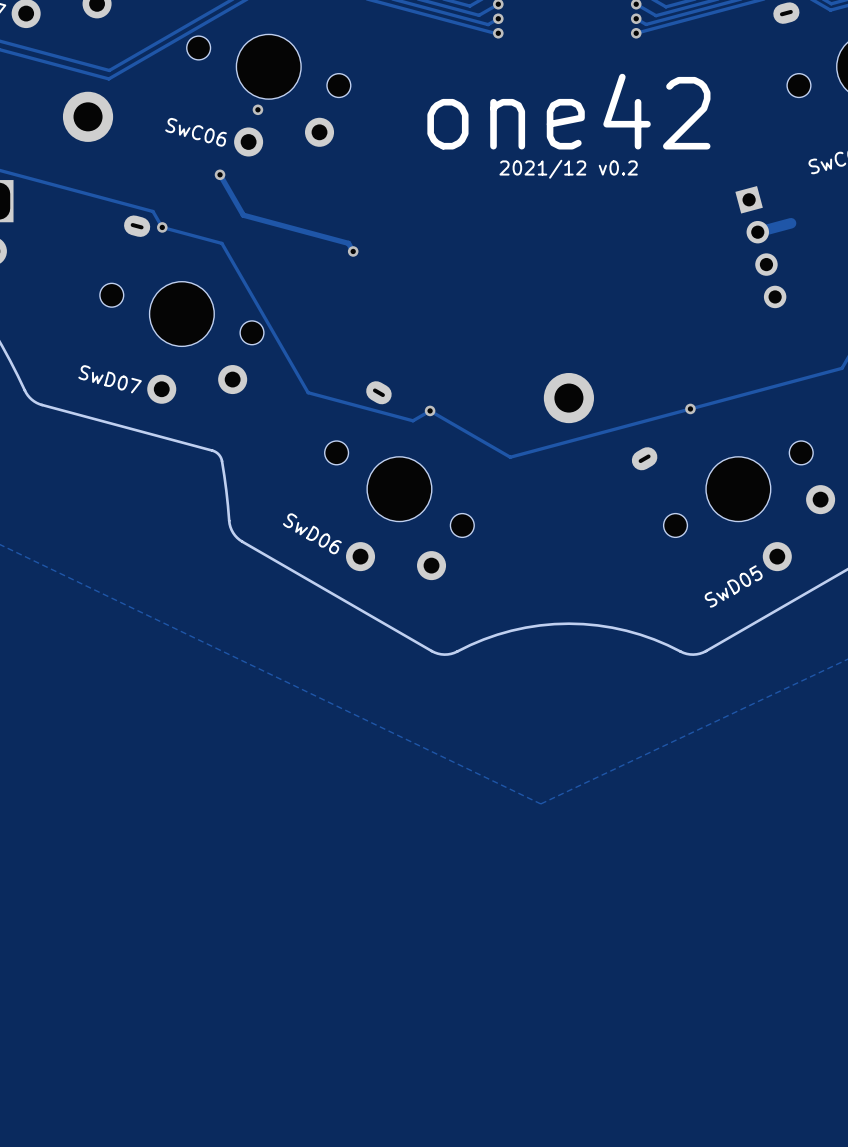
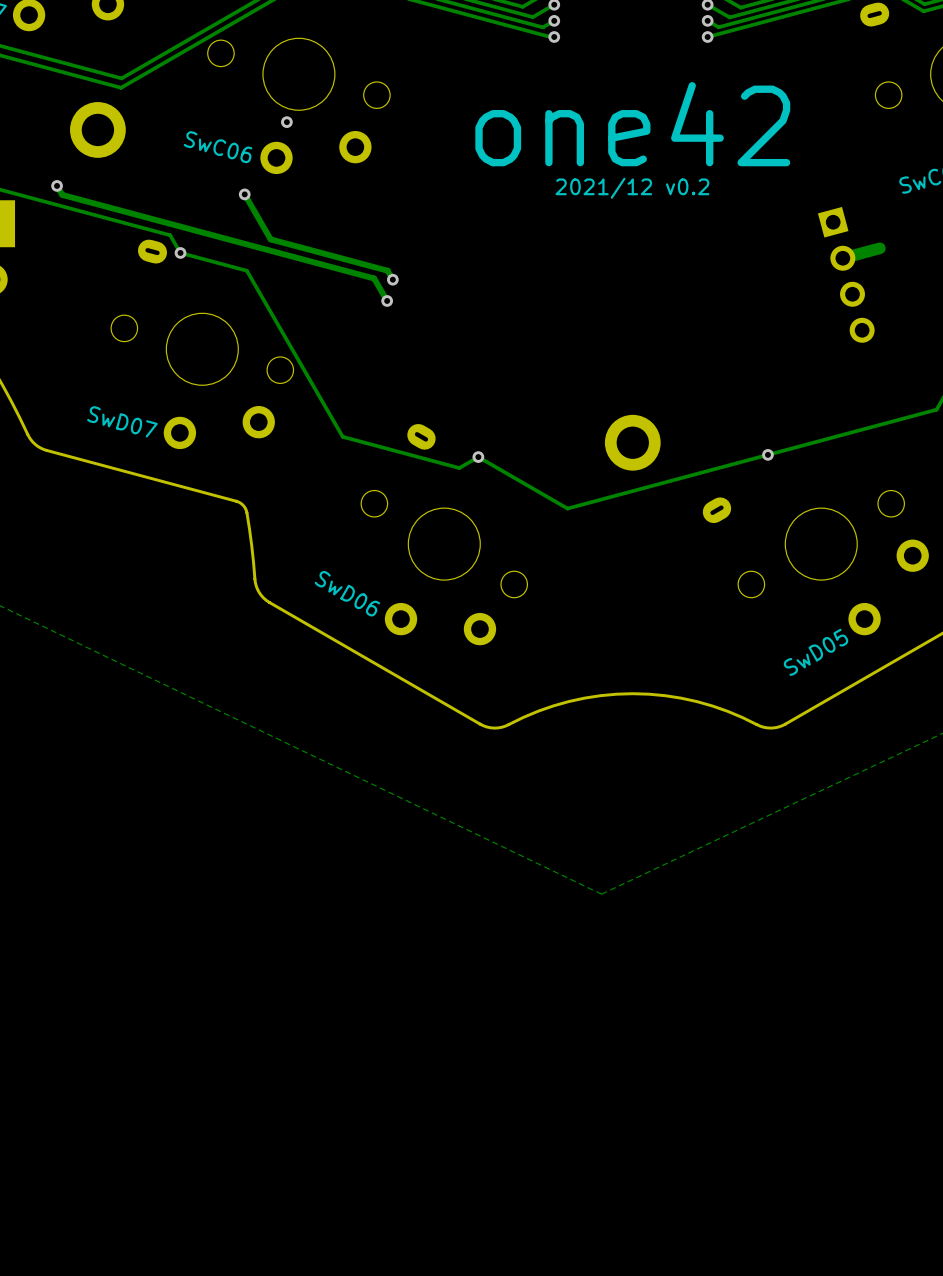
track: none -> (57, 185) (62, 194) (374, 278) (387, 300)
via: none -> (57, 185)
via: none -> (387, 300)

